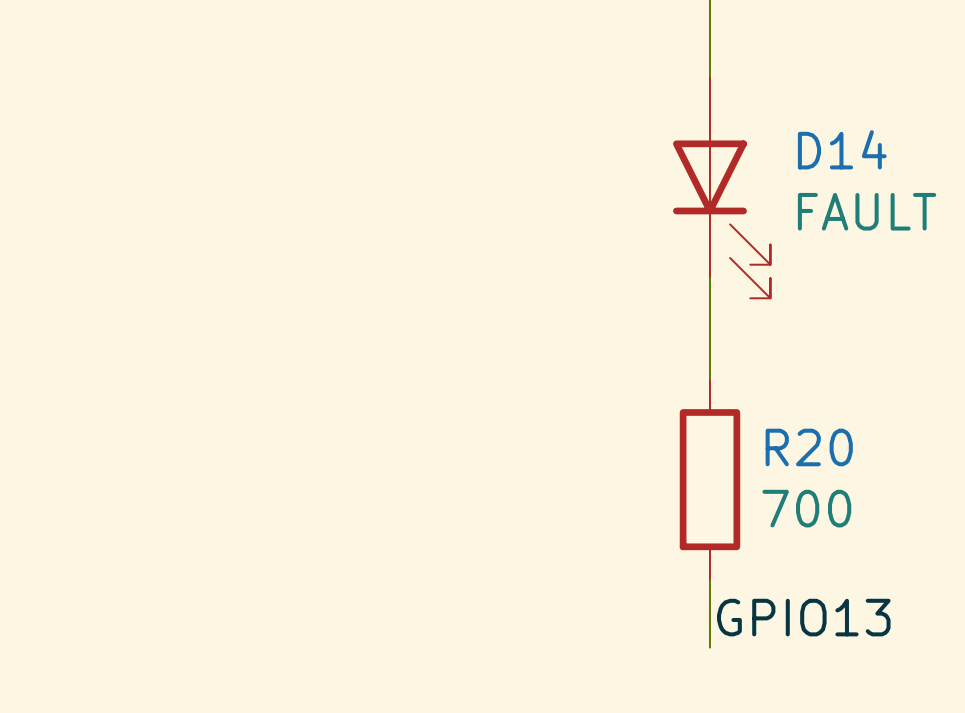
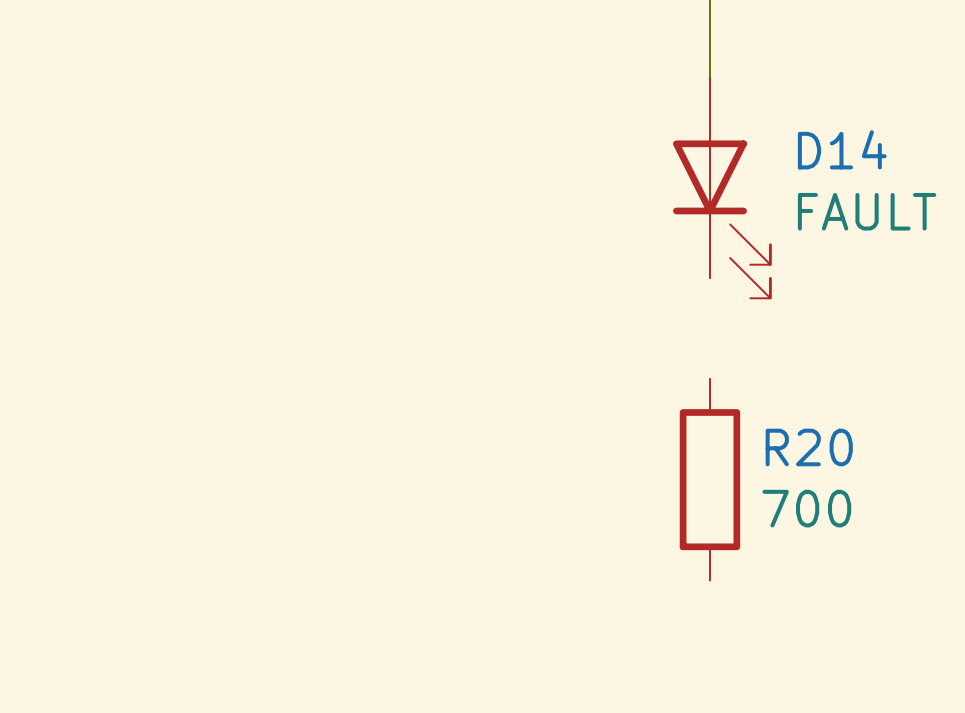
wire: (709, 278) (709, 378) -> none
wire: (709, 580) (709, 647) -> none
label: GPIO13 (803, 617) -> none

